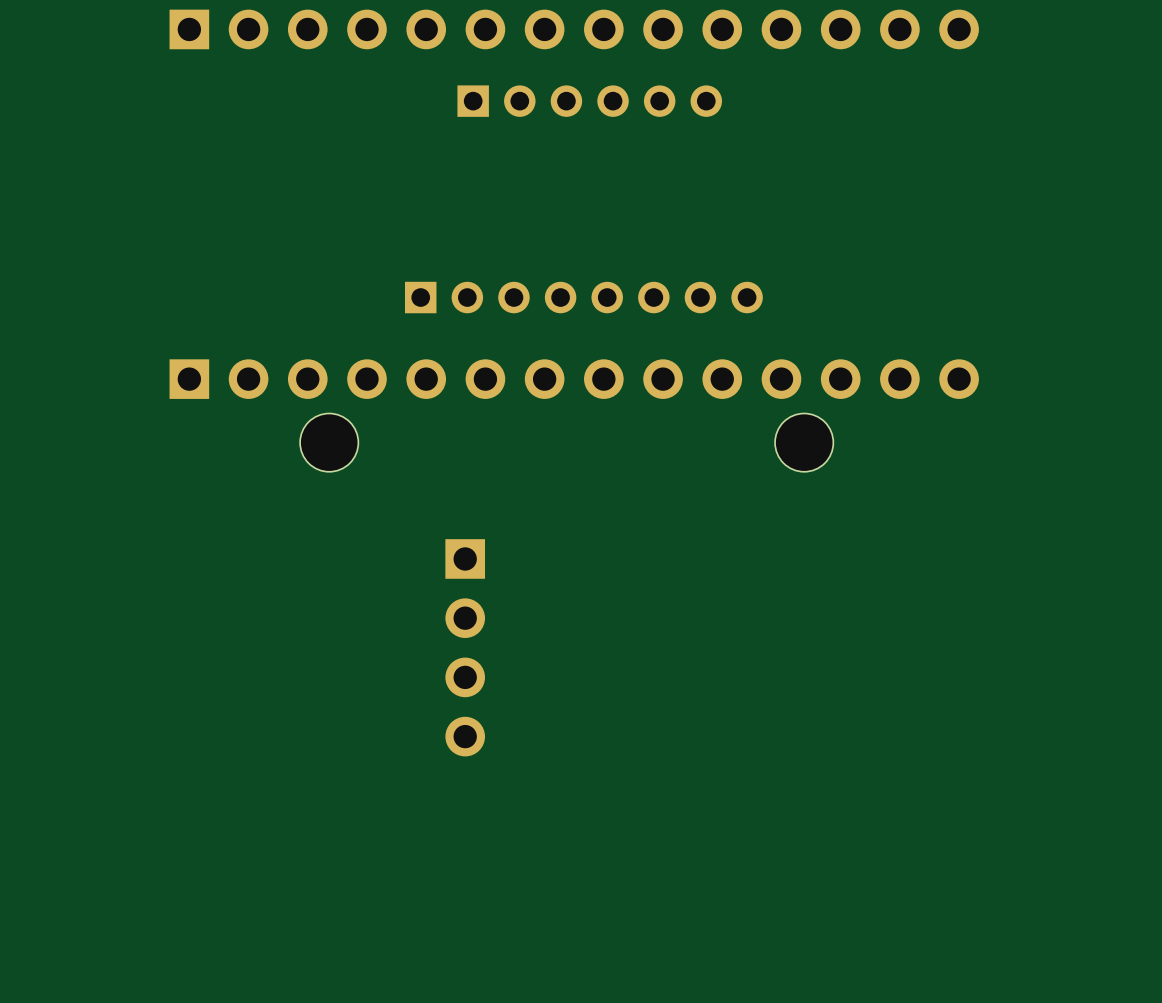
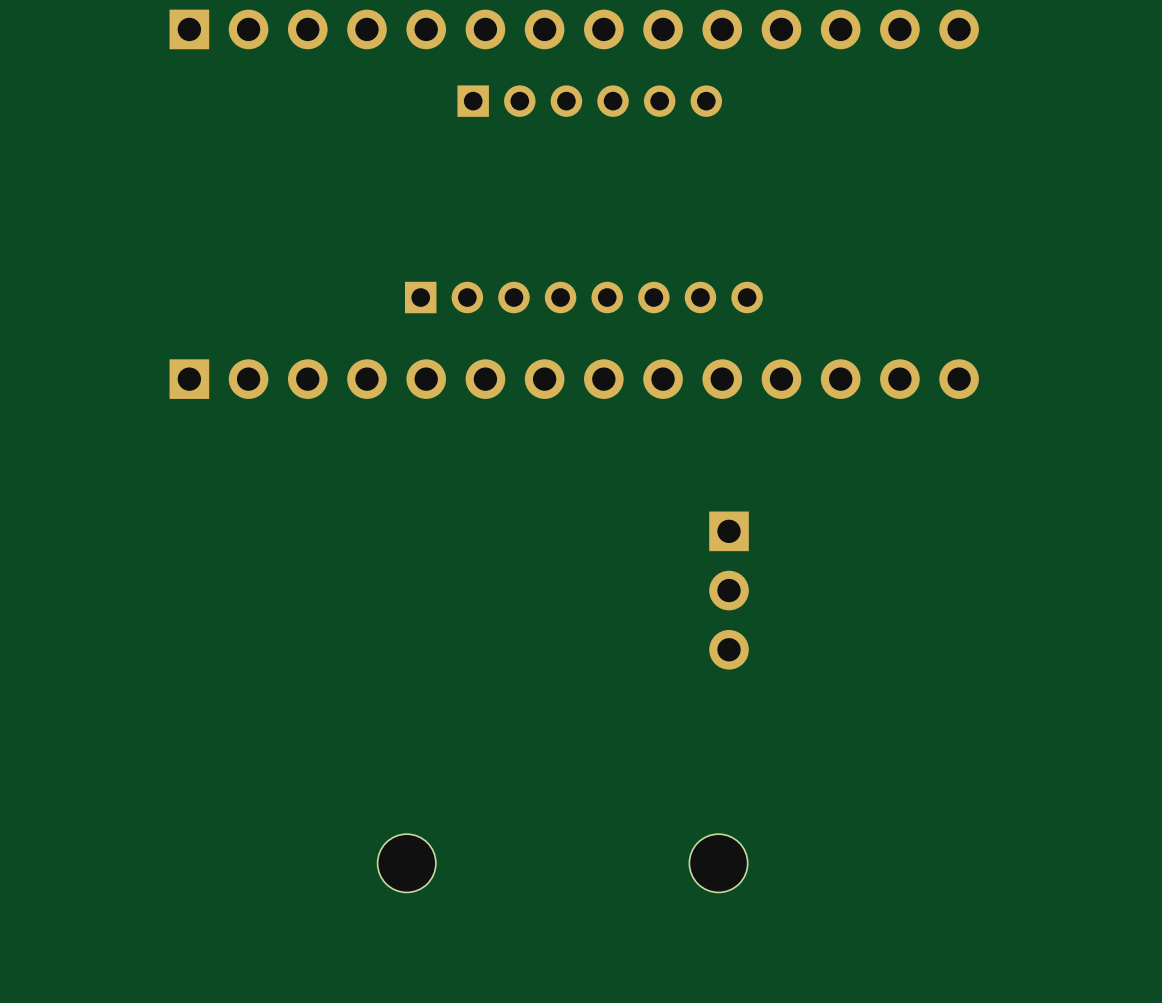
part: (329, 442) -> none
part: (804, 442) -> none
part: none -> (729, 590)
part: (465, 647) -> none
part: none -> (406, 863)
part: none -> (718, 863)

